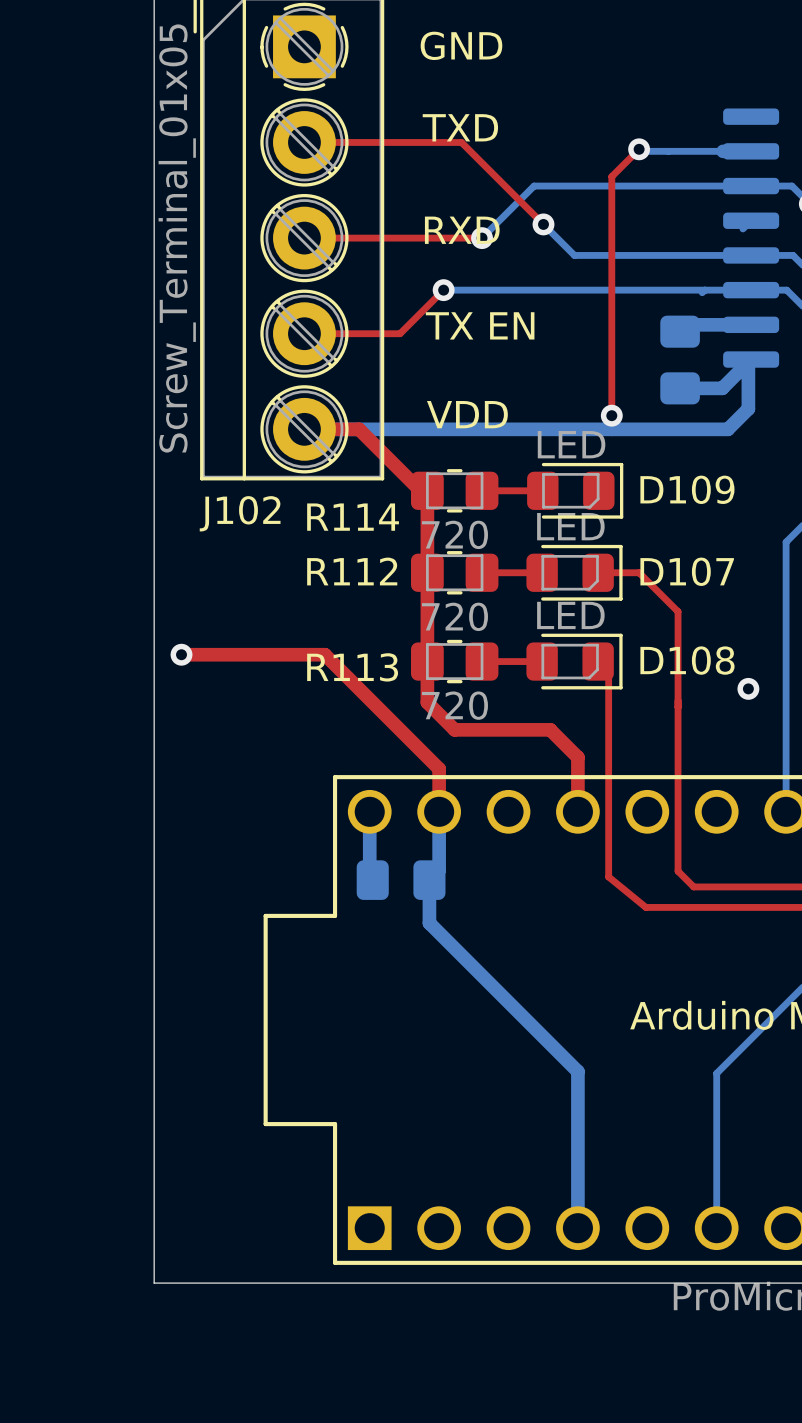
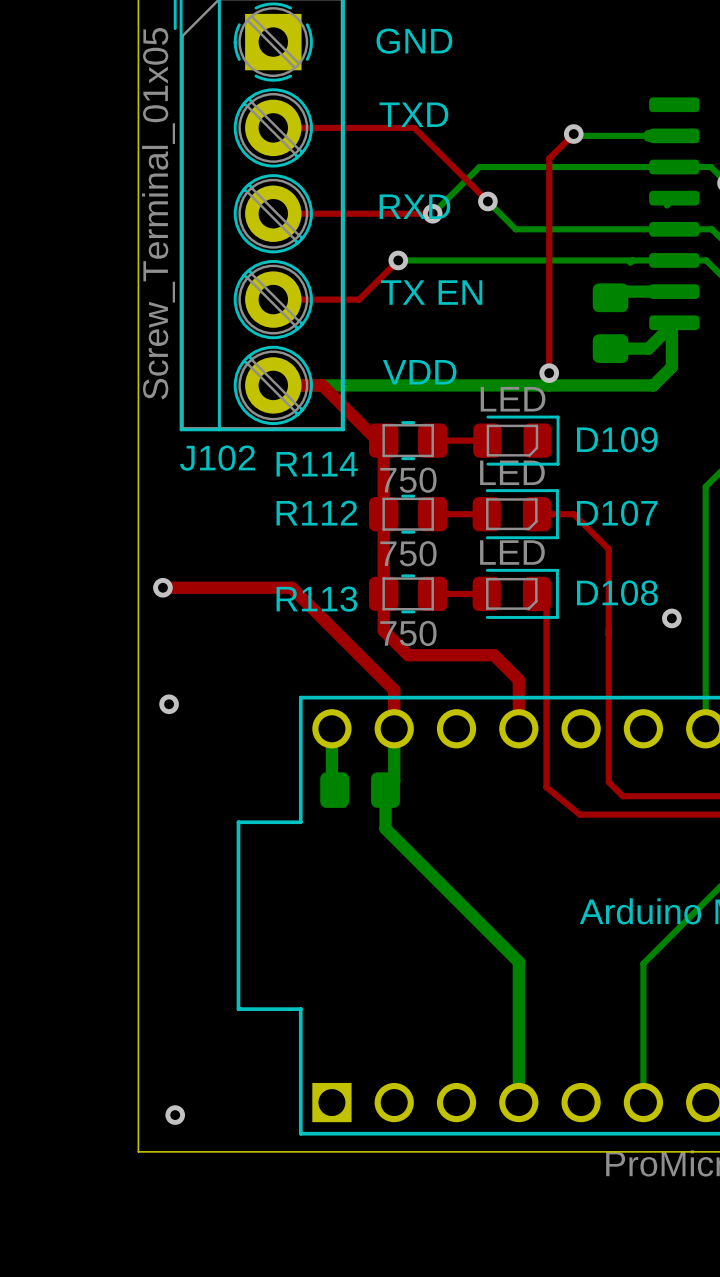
R114 value: 720 (455, 534) -> 750 (408, 480)
R112 value: 720 (455, 616) -> 750 (408, 553)
R113 value: 720 (455, 705) -> 750 (408, 633)
via: none -> (169, 704)
via: none -> (175, 1115)

